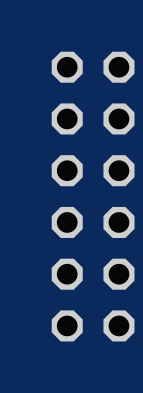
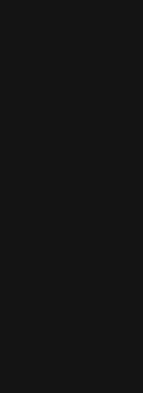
part: (93, 196) -> none

